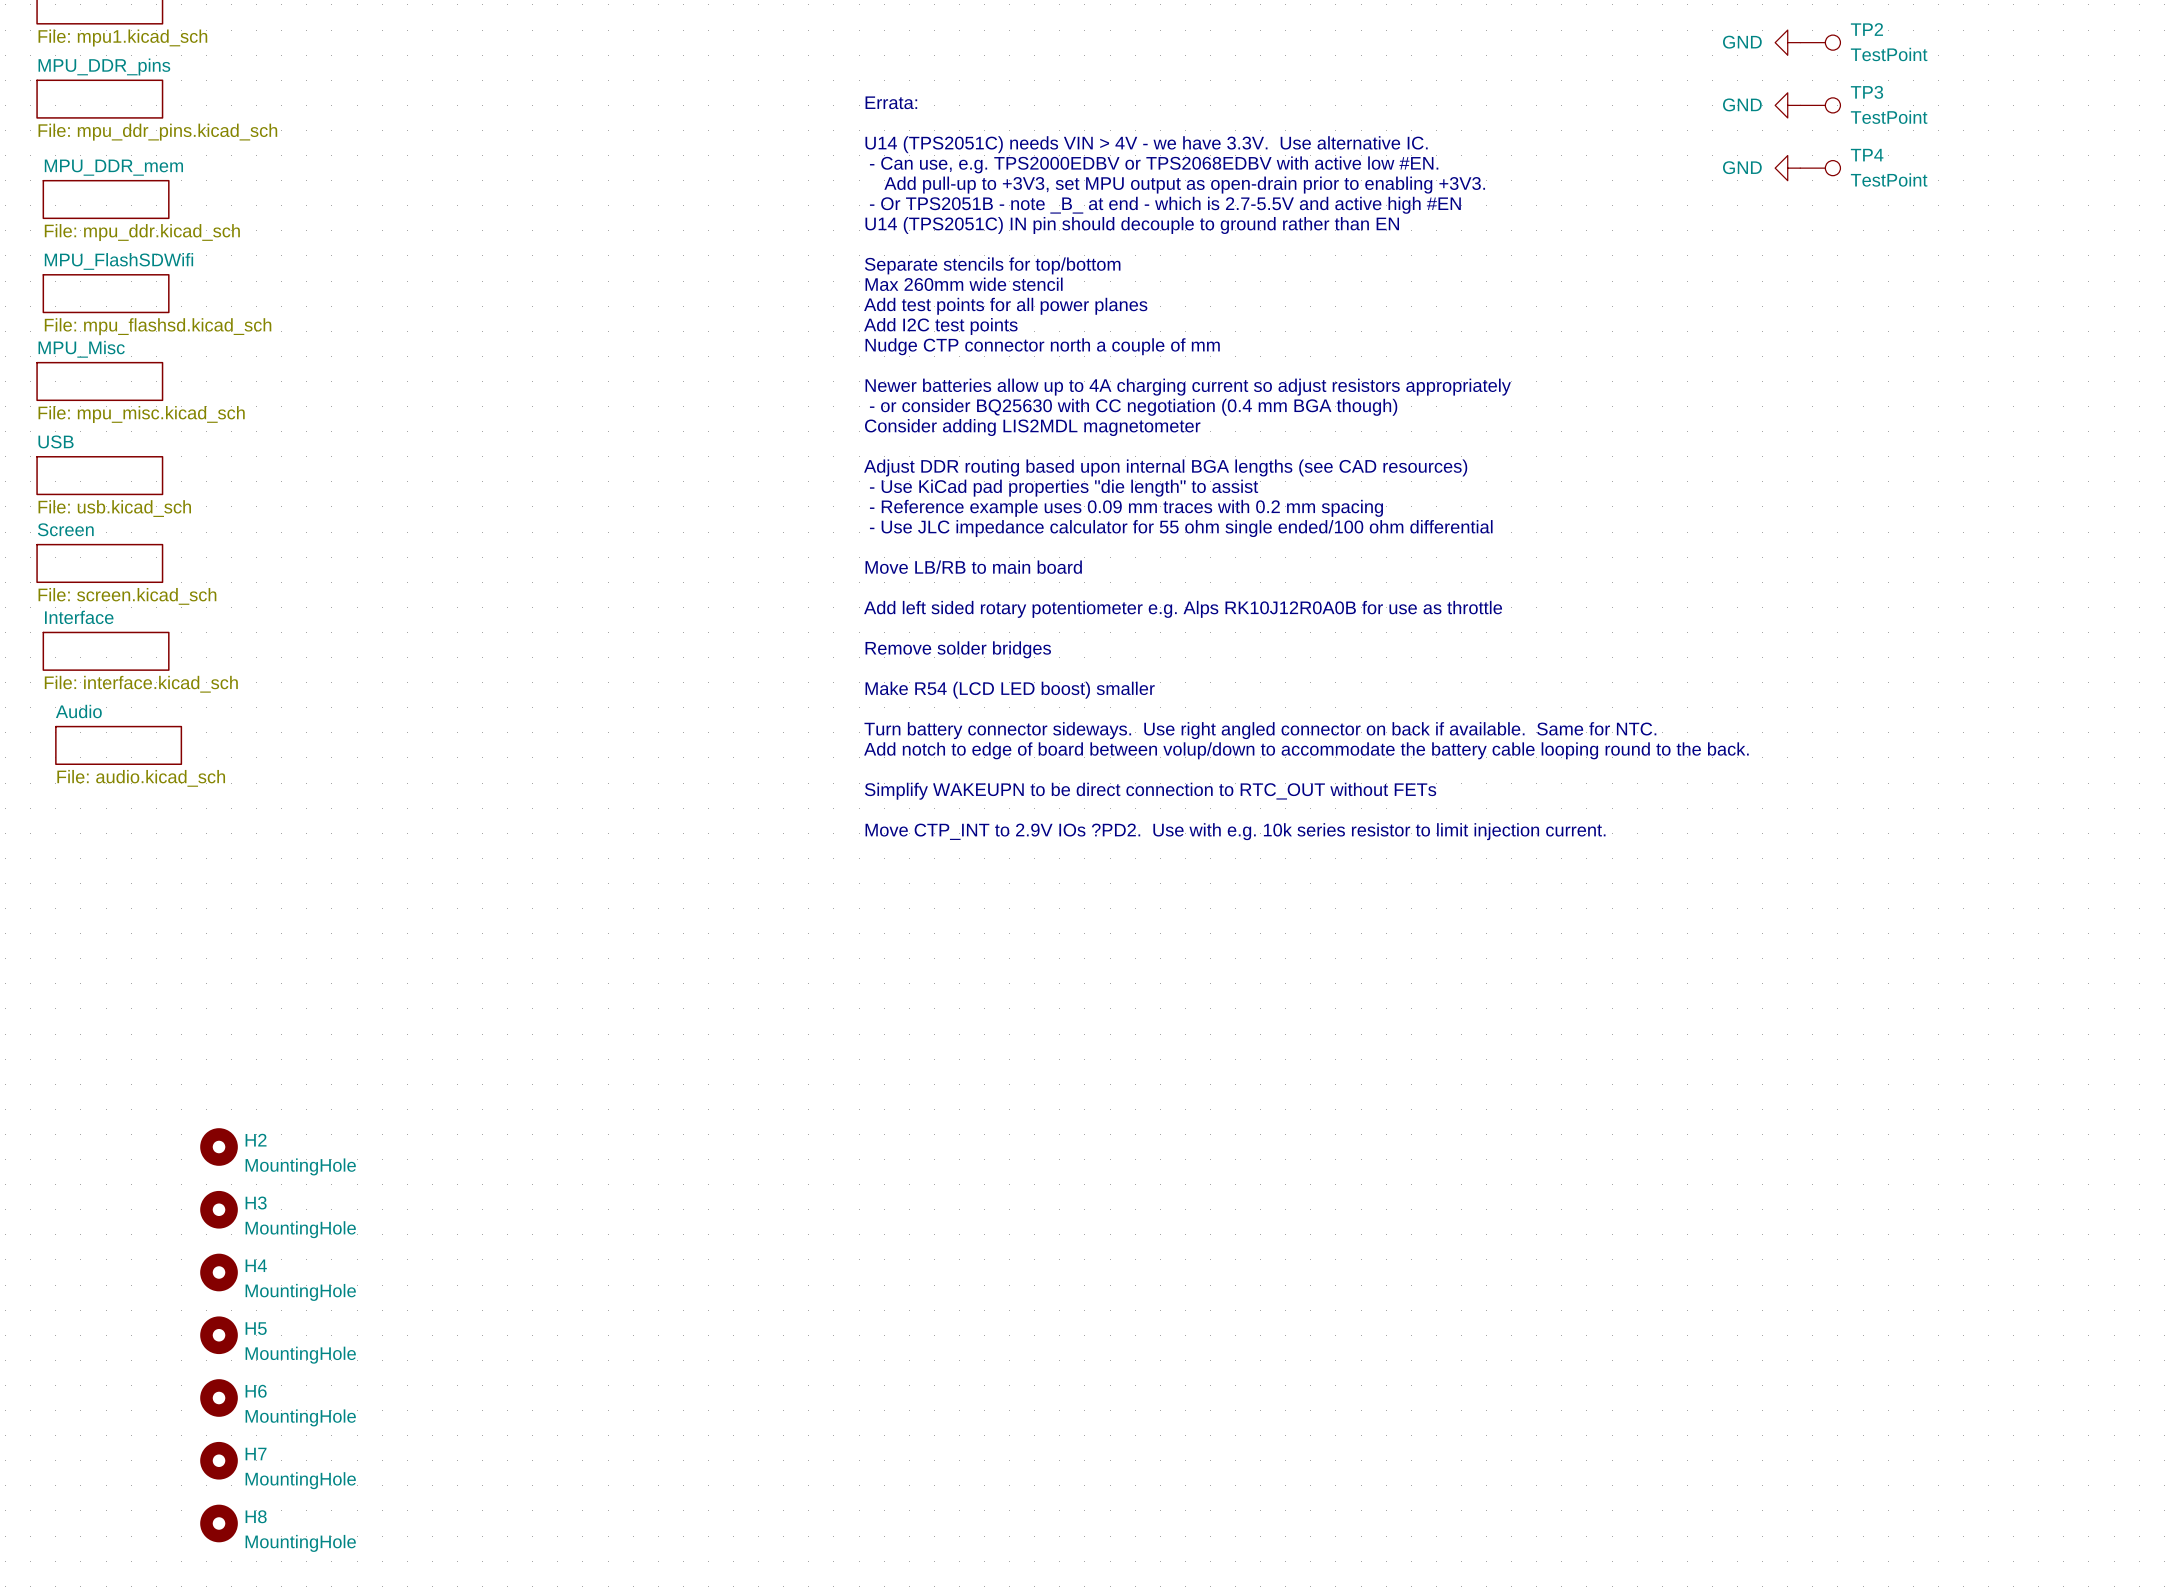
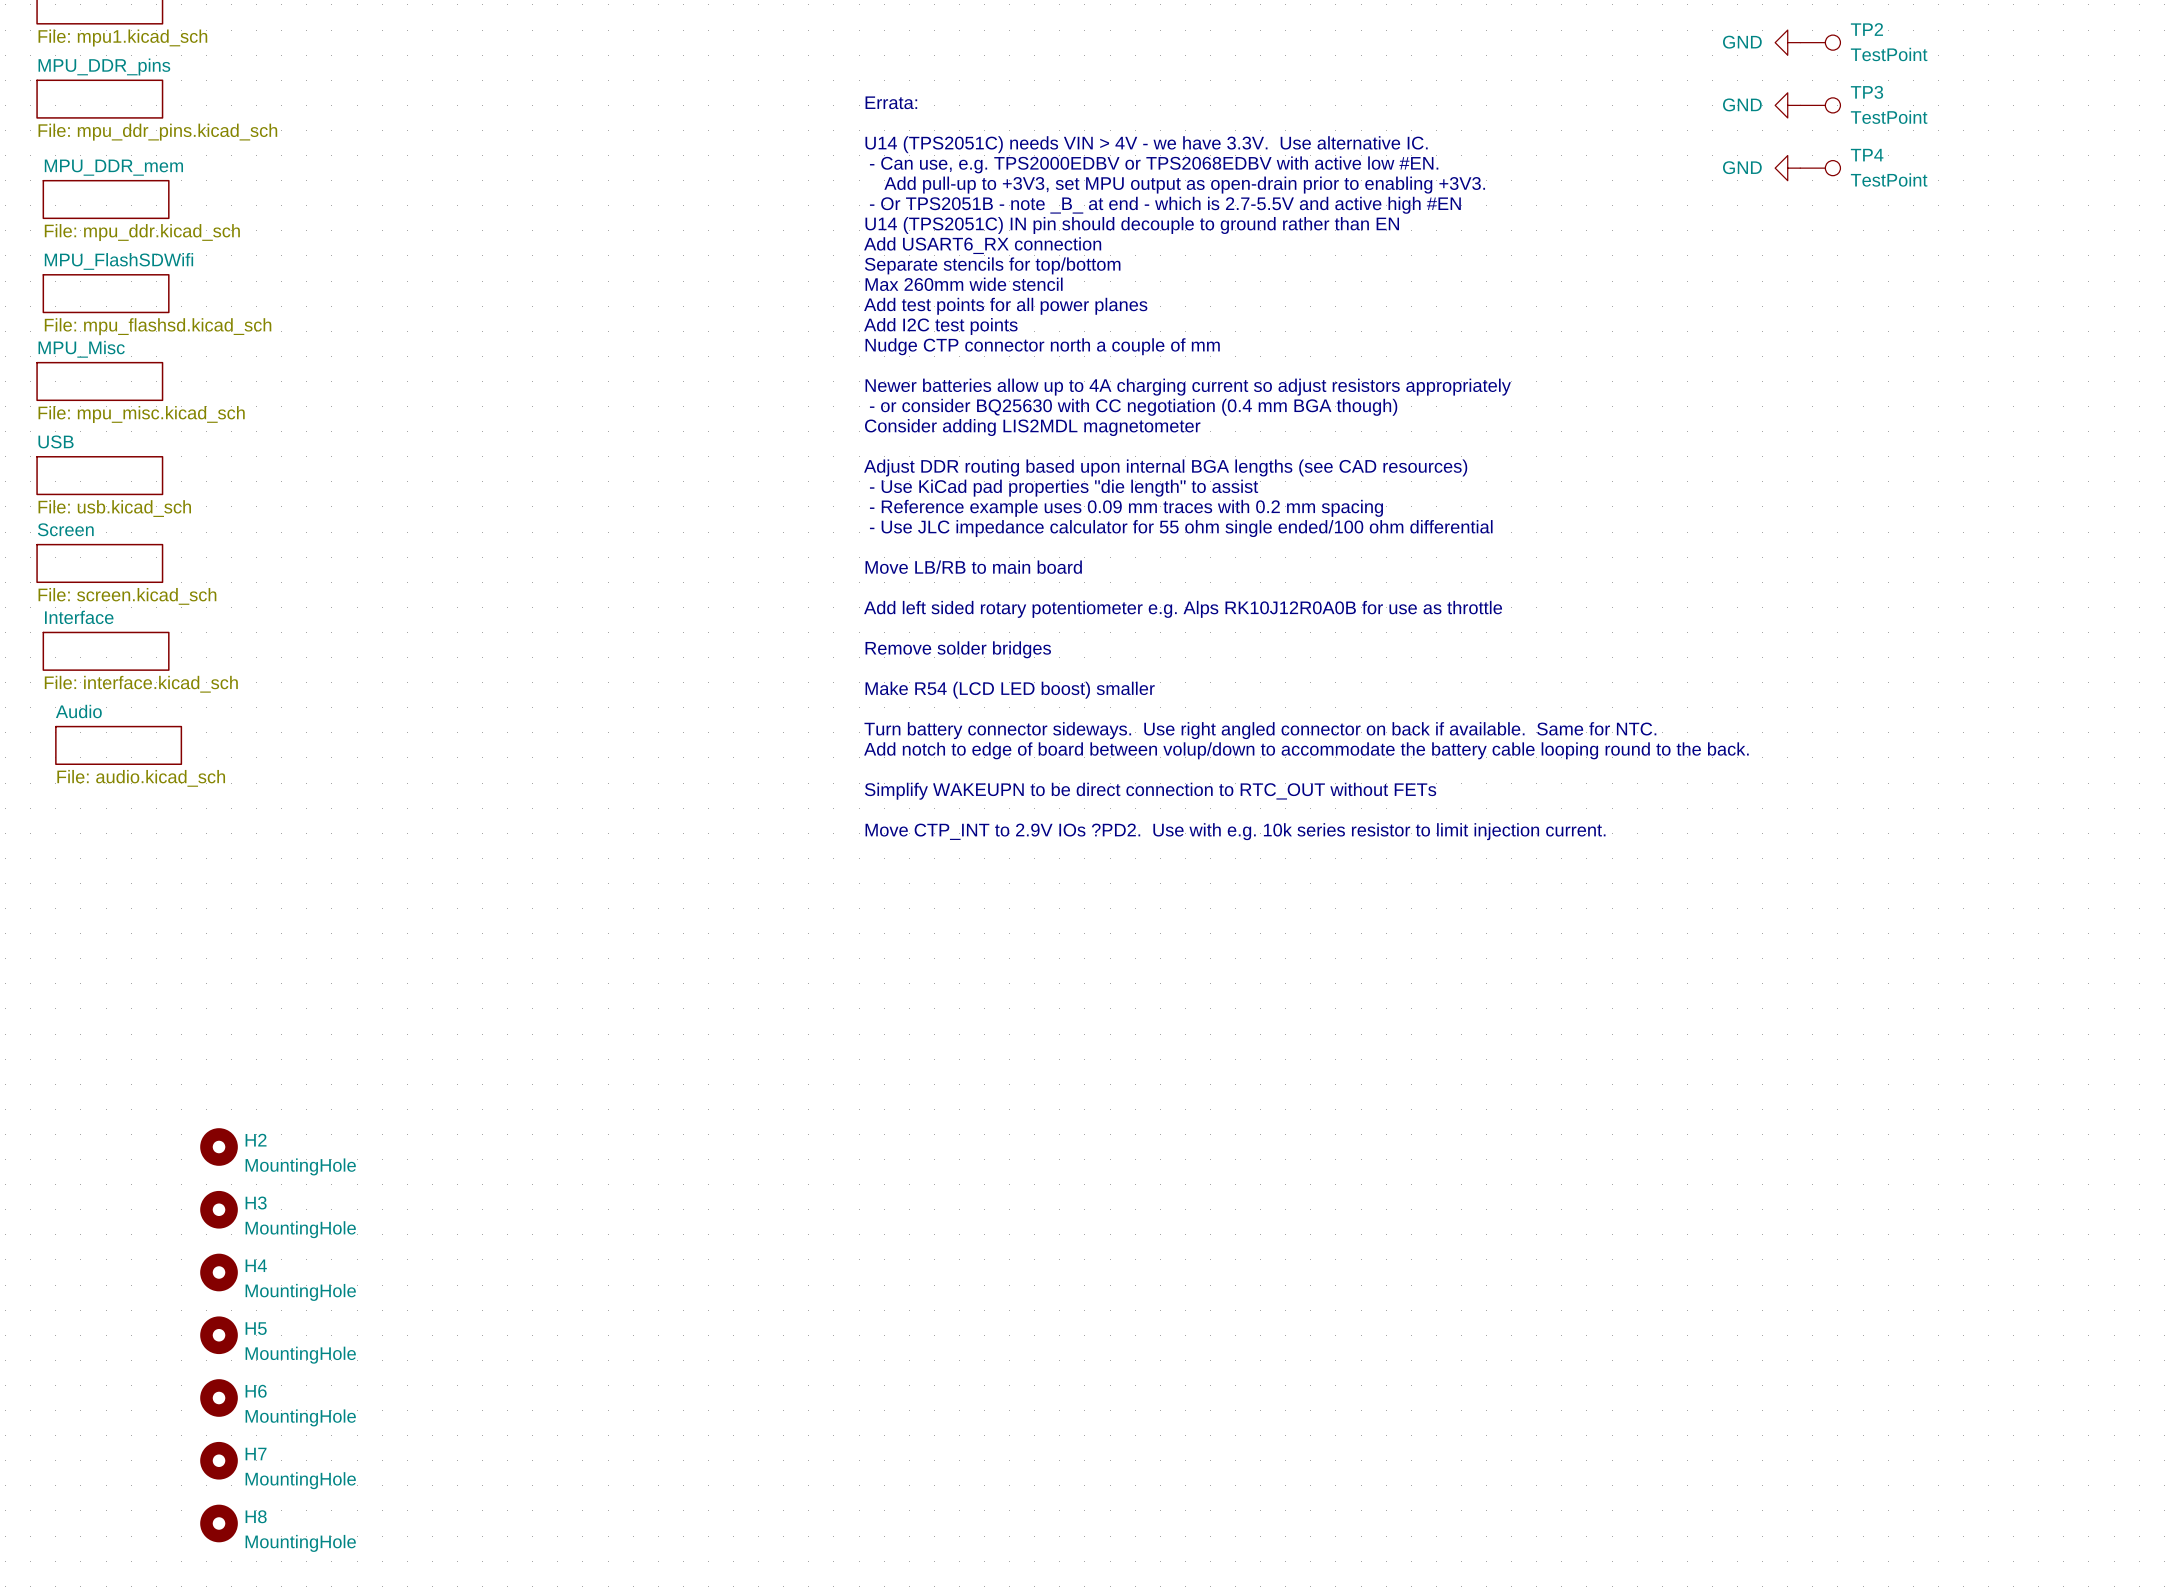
text: none -> Add USART6_RX connection (982, 245)

